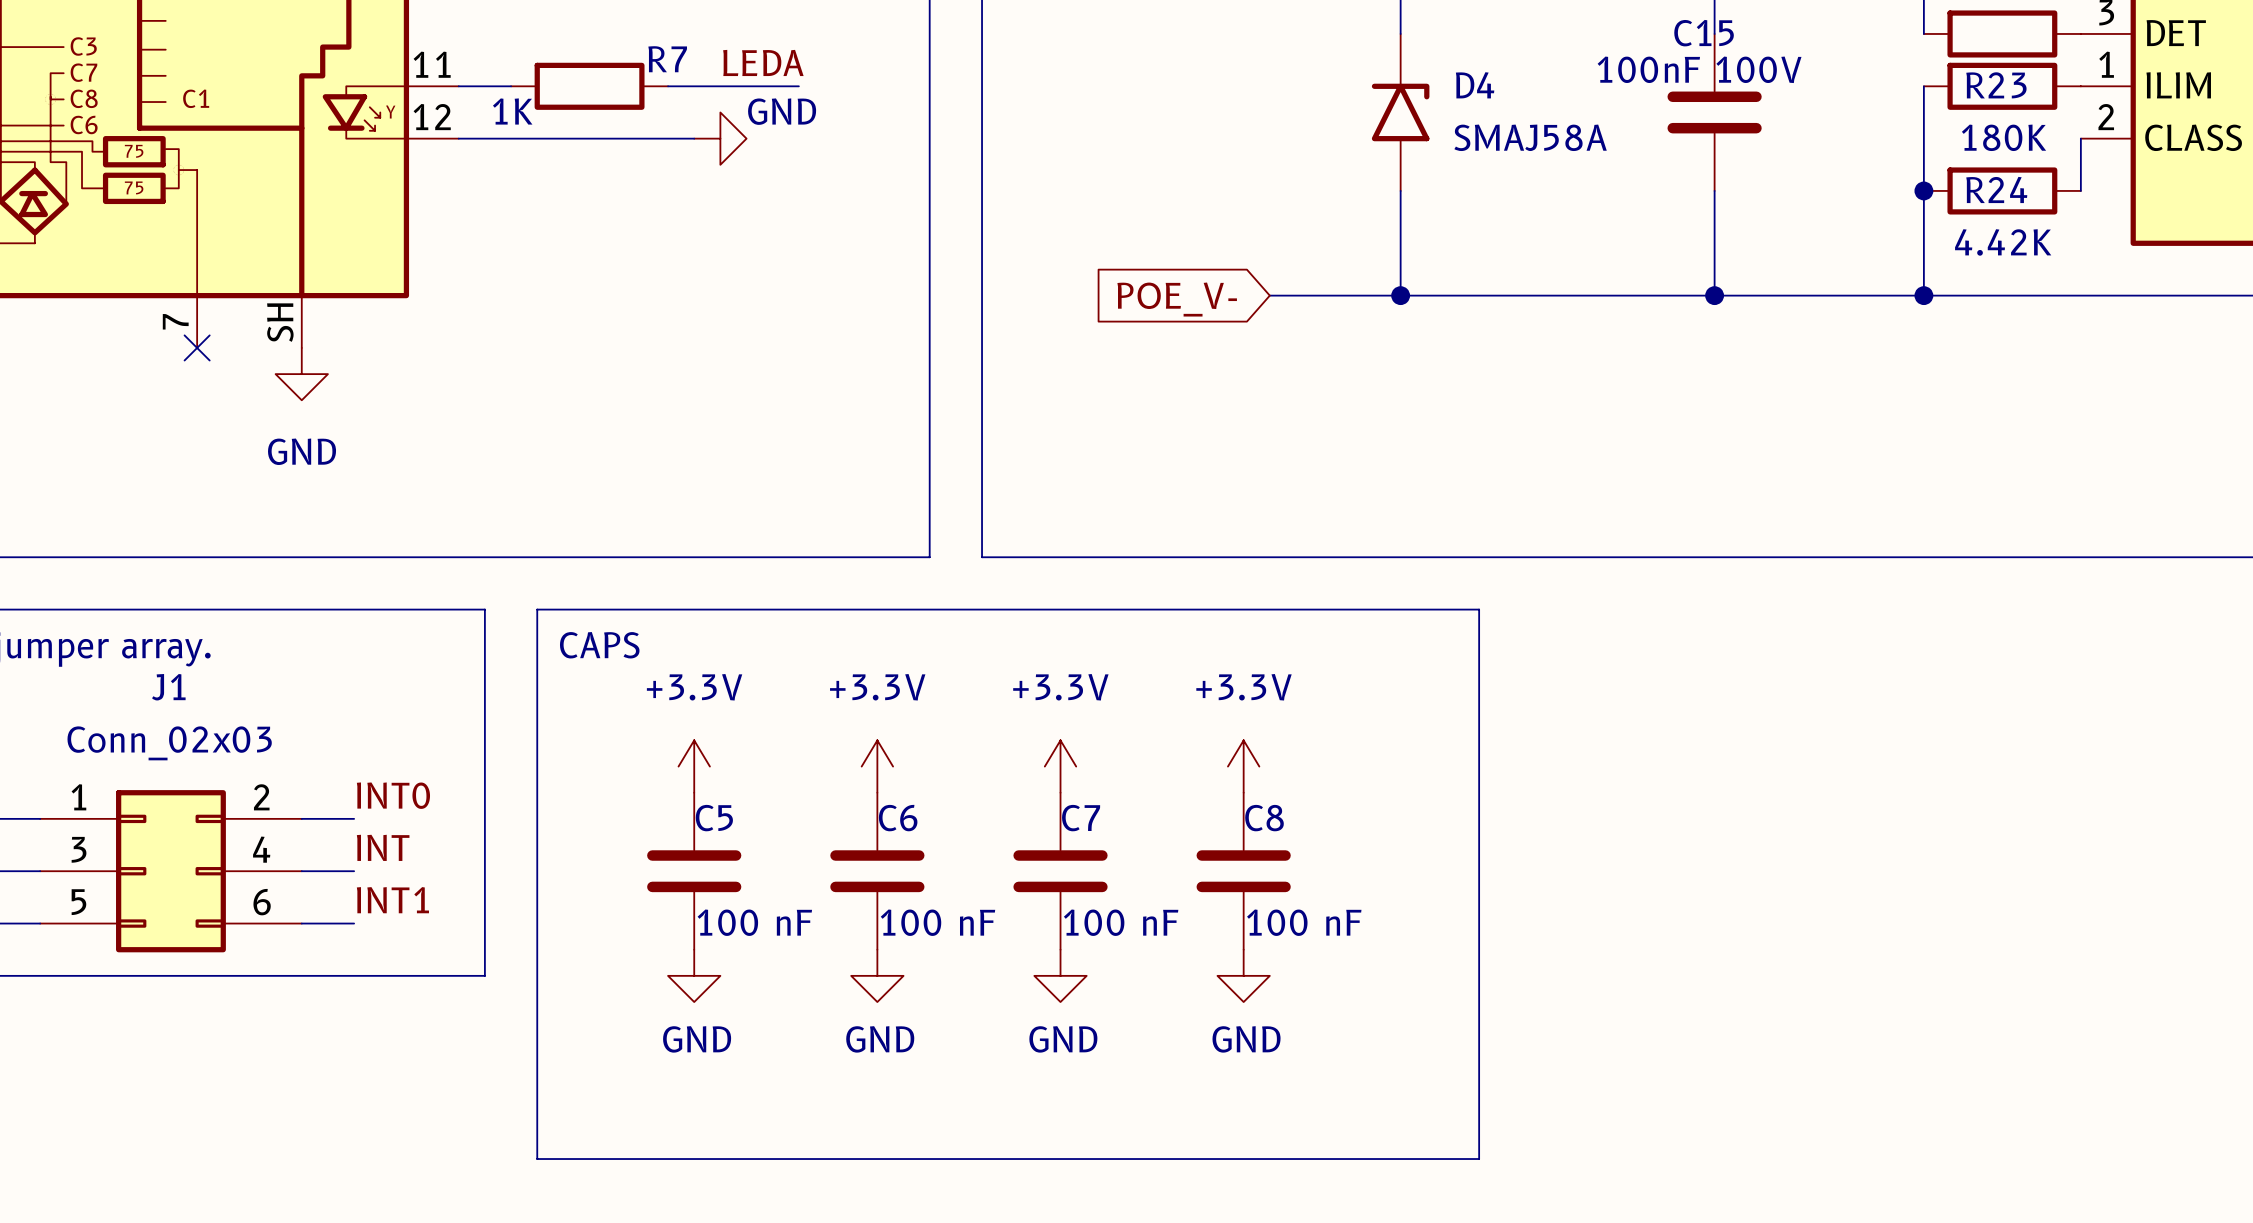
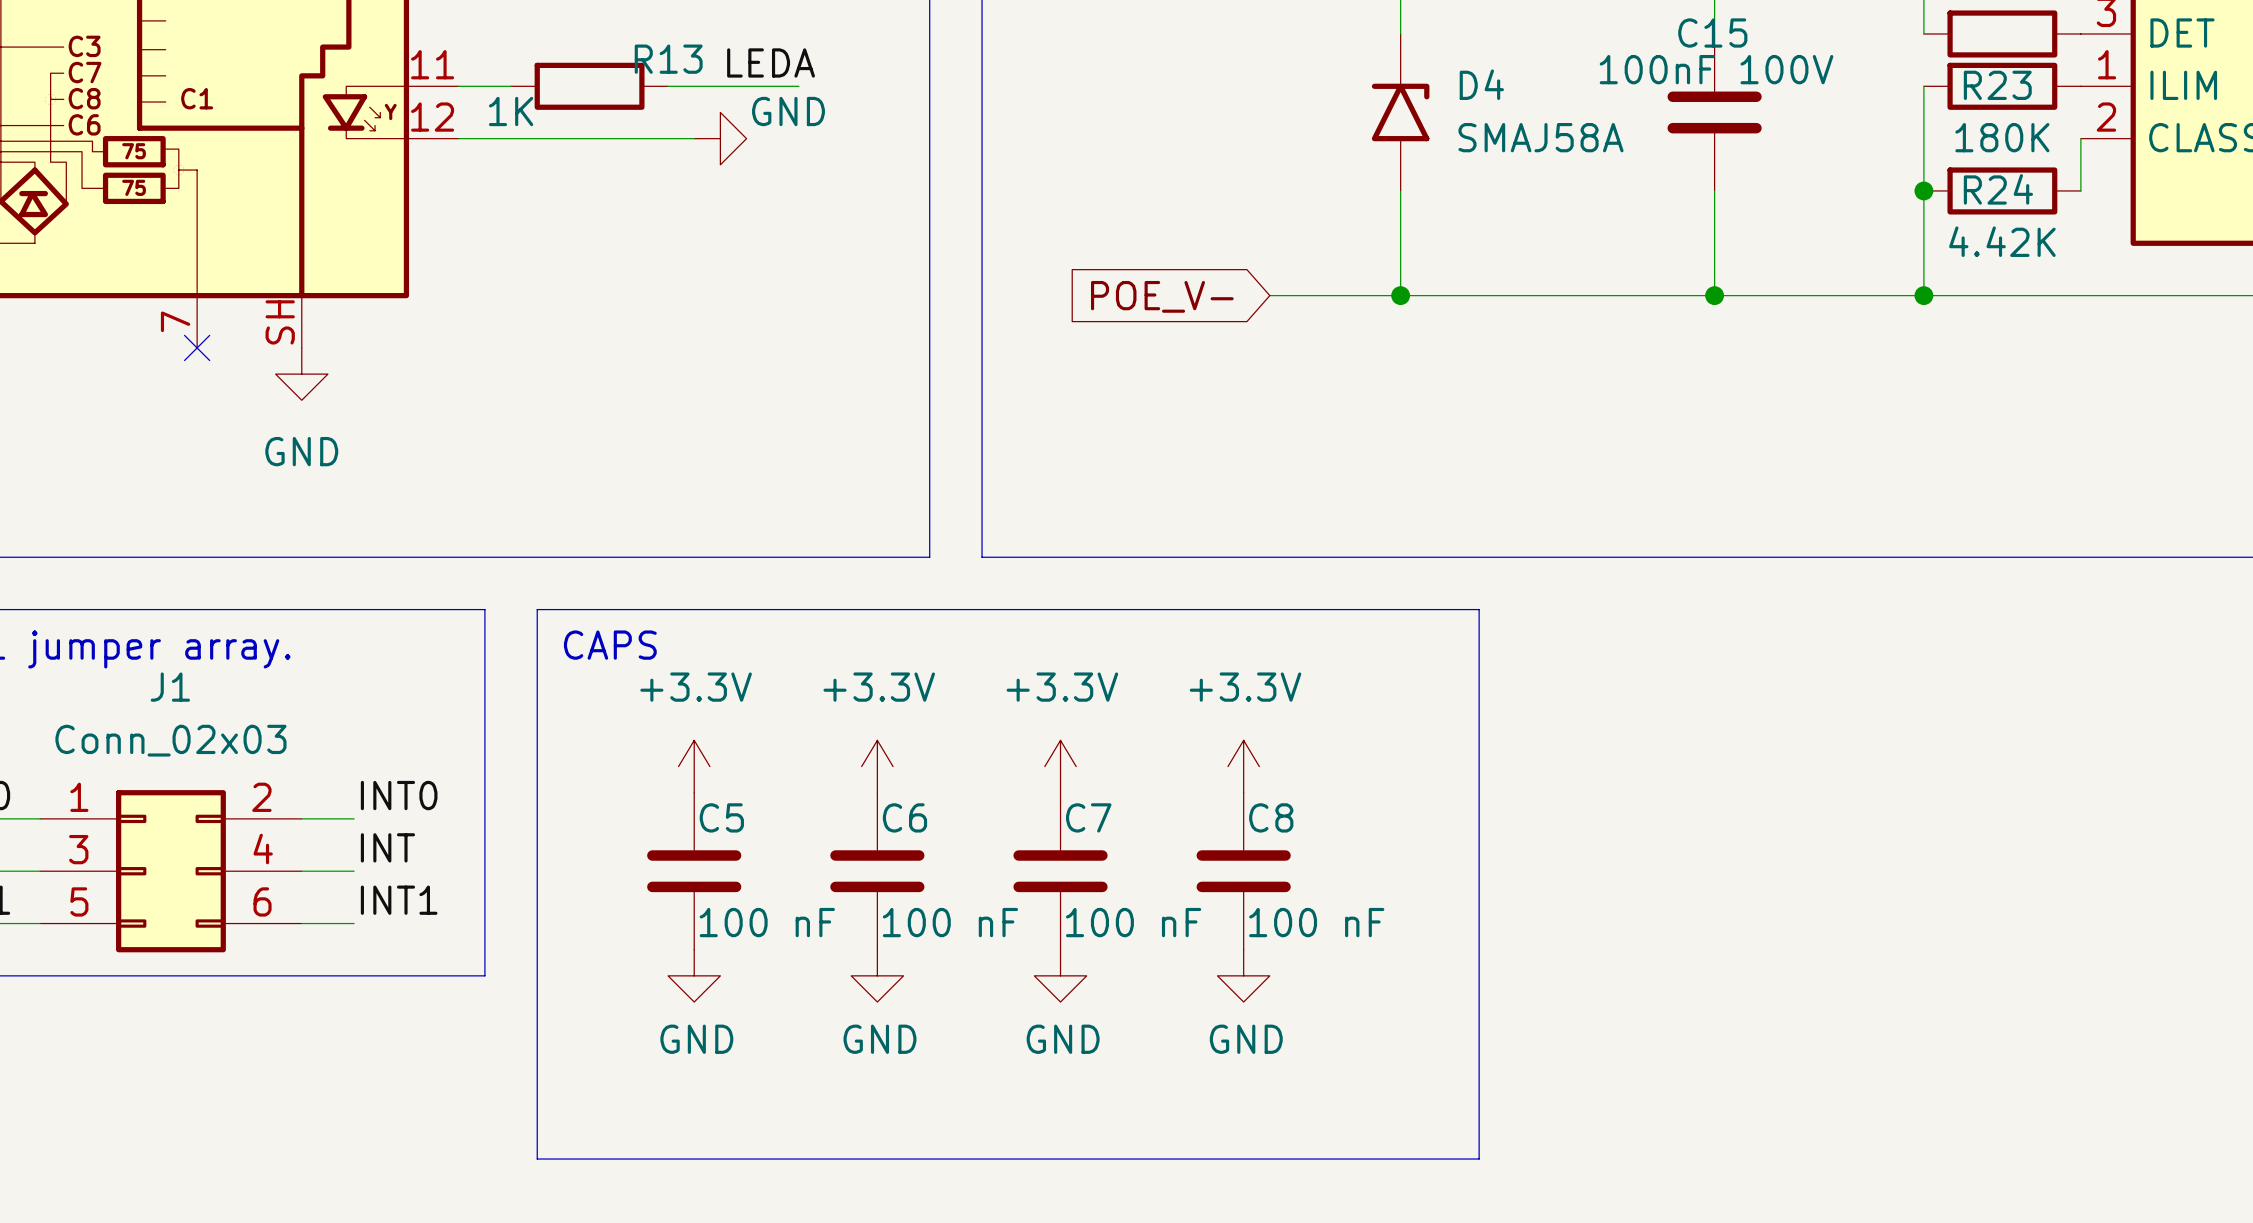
R7 name: R7 (667, 59) -> R13 (668, 59)

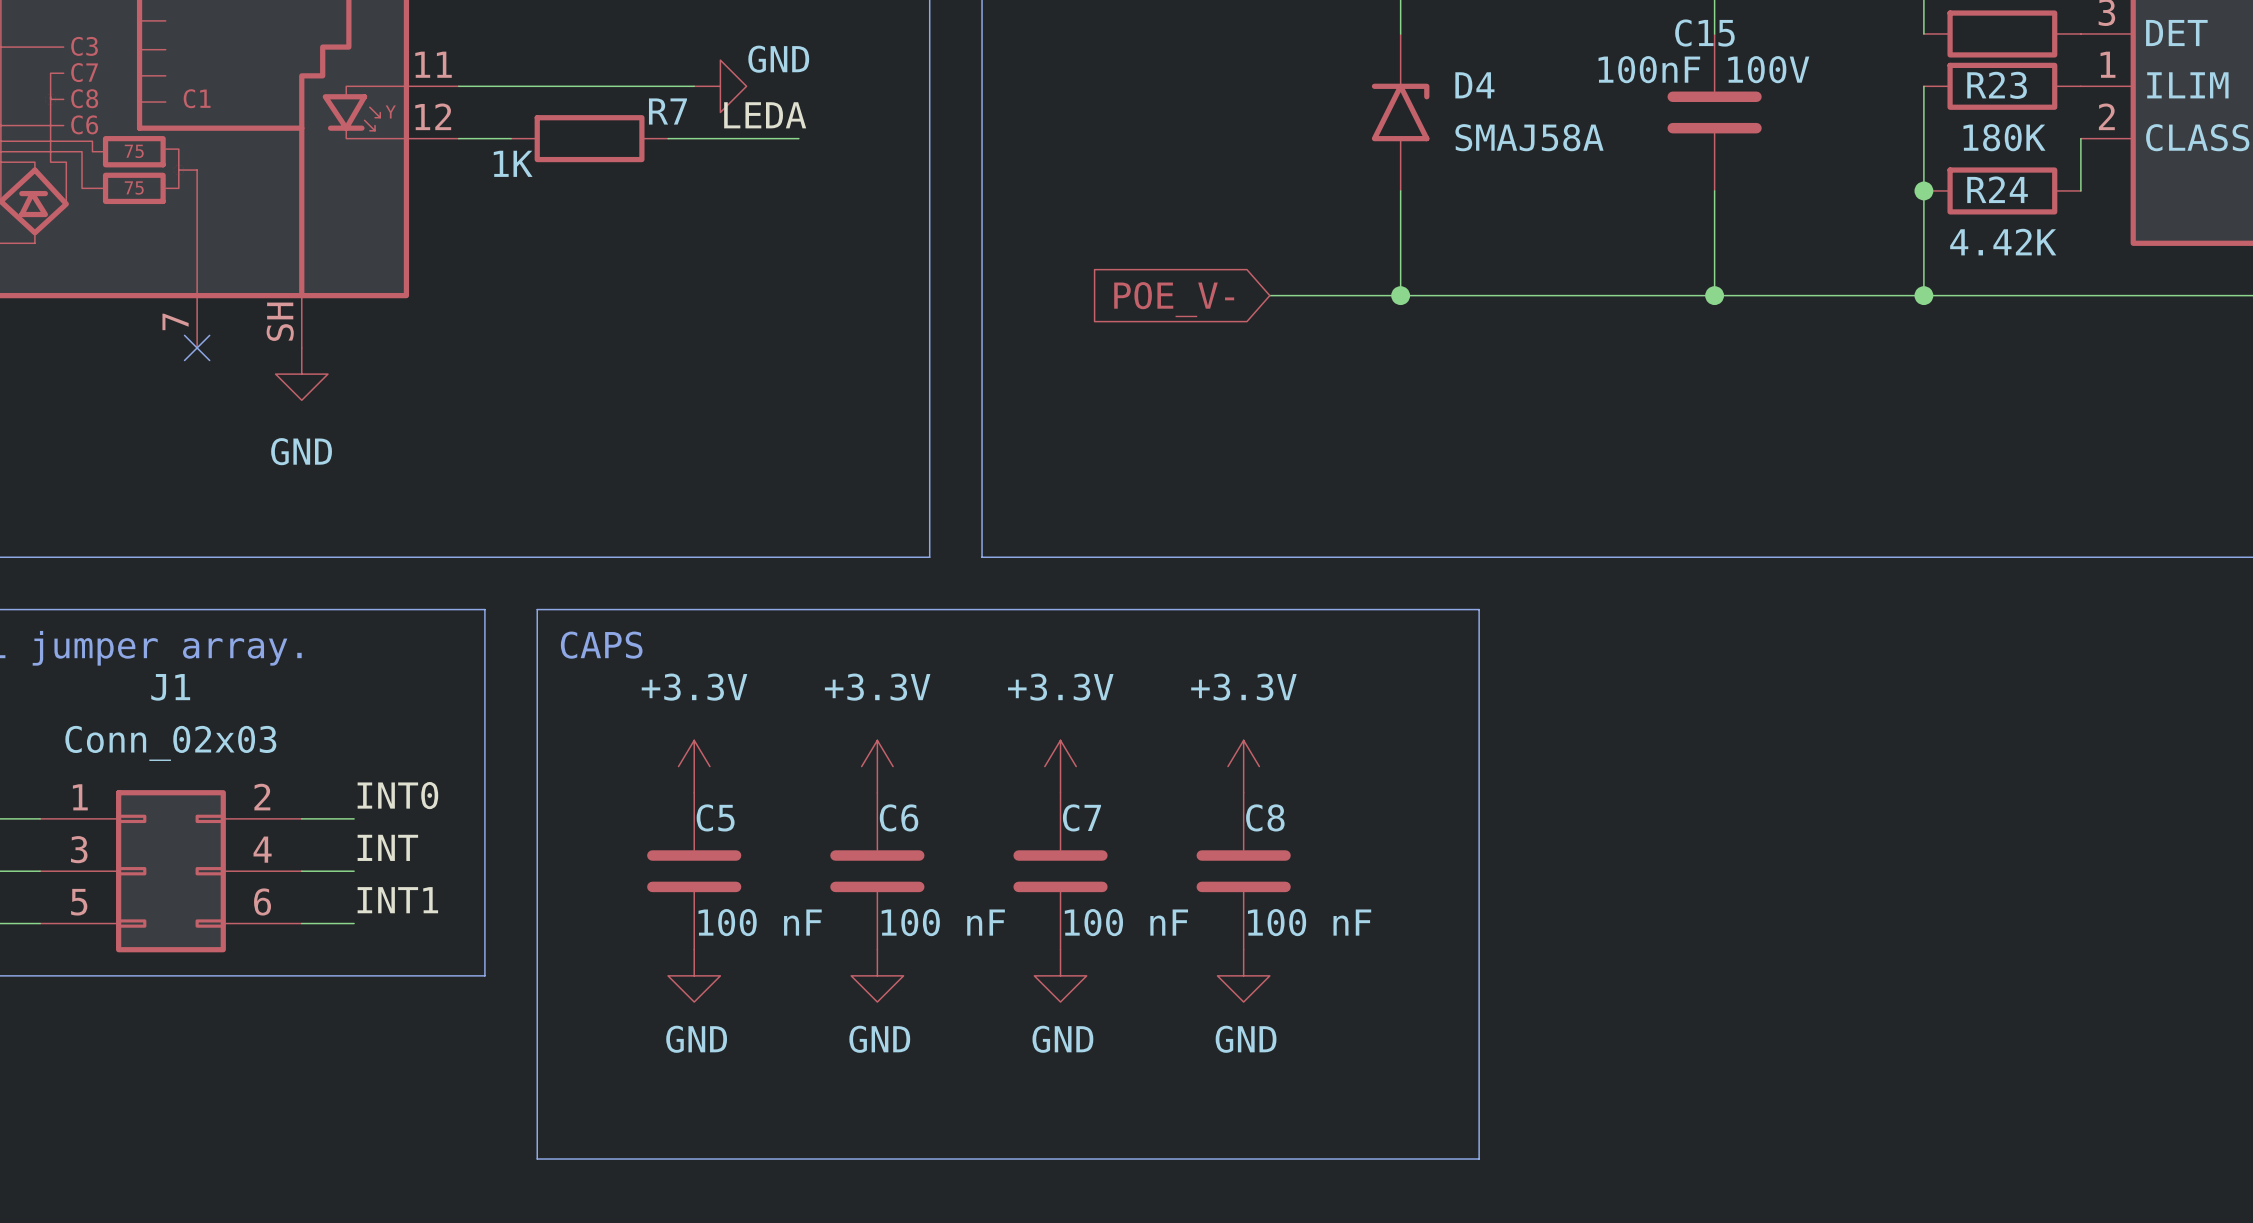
label position: LEDA (771, 62) -> LEDA (765, 115)
R13: 1K (589, 86) -> none
wire: (694, 86) (798, 86) -> (694, 138) (798, 138)
wire: (511, 138) (668, 138) -> (511, 86) (668, 86)
R7: none -> 1K (589, 138)
power symbol position: GND (720, 138) -> GND (720, 86)

